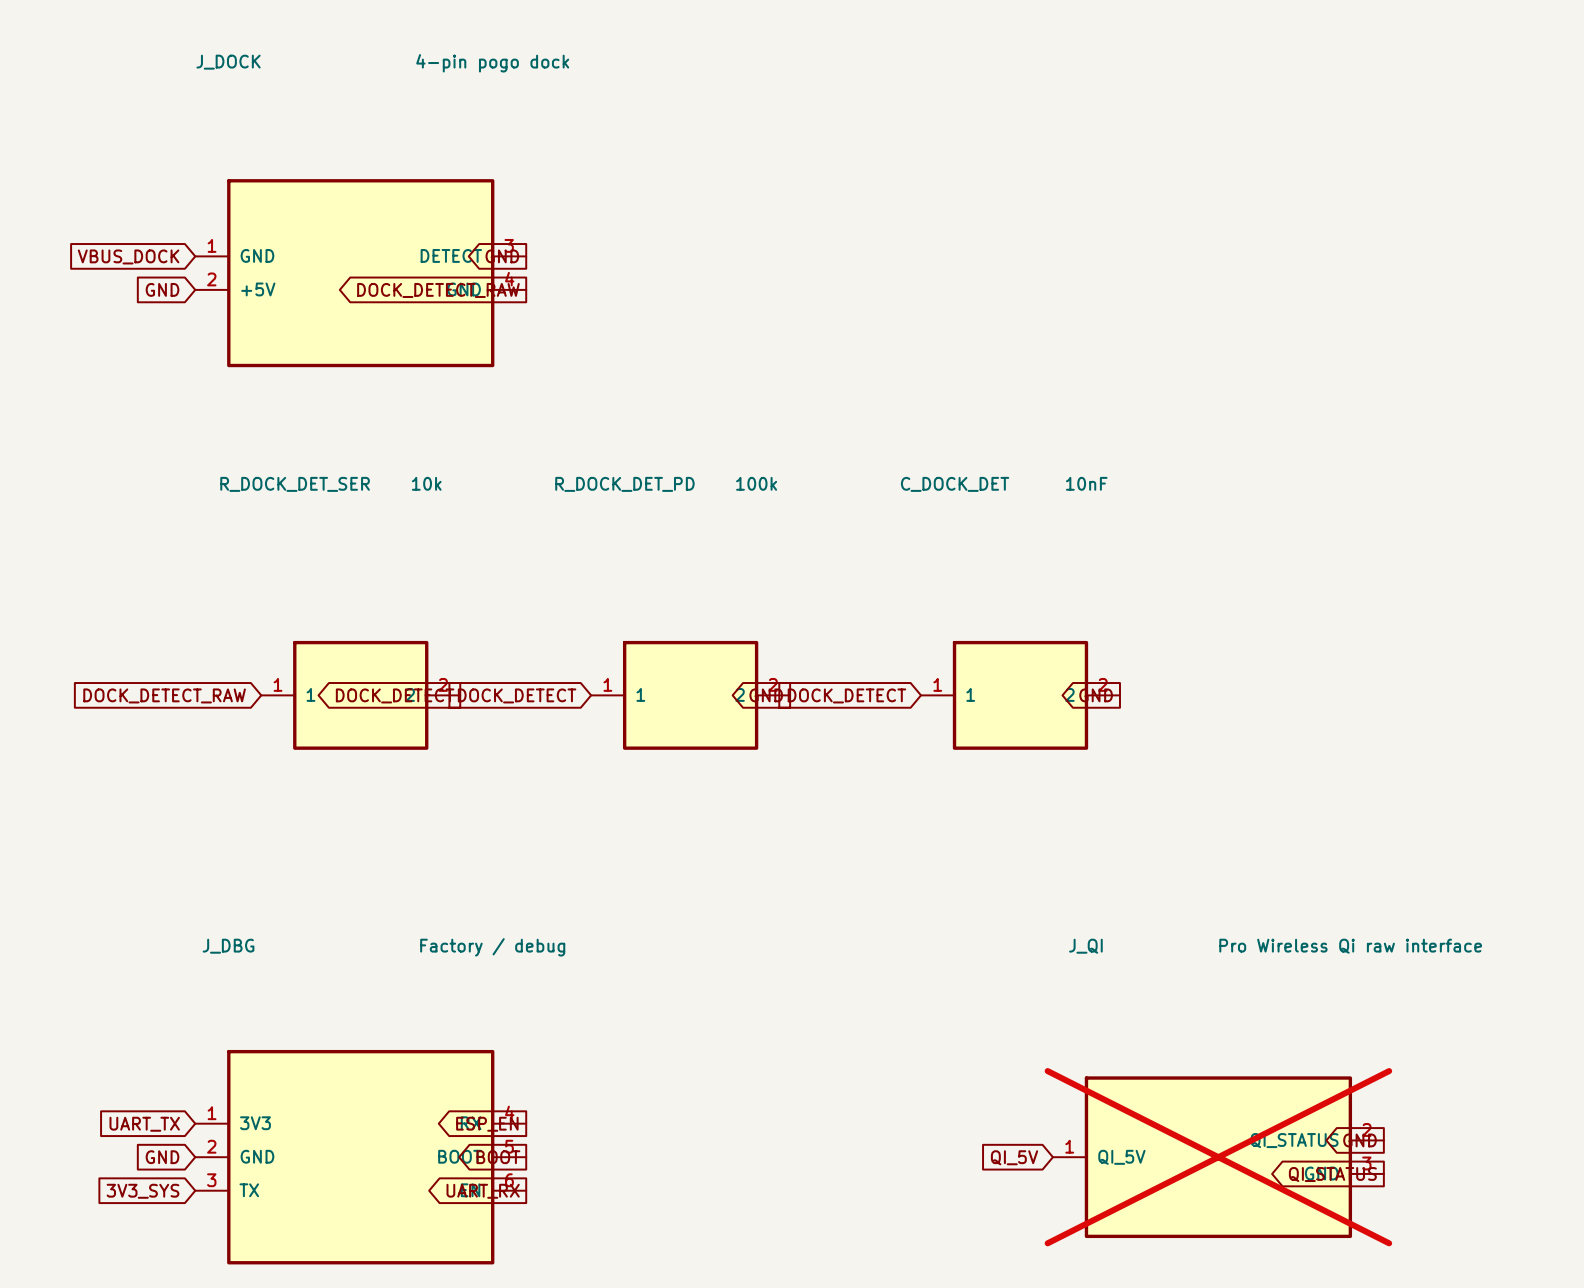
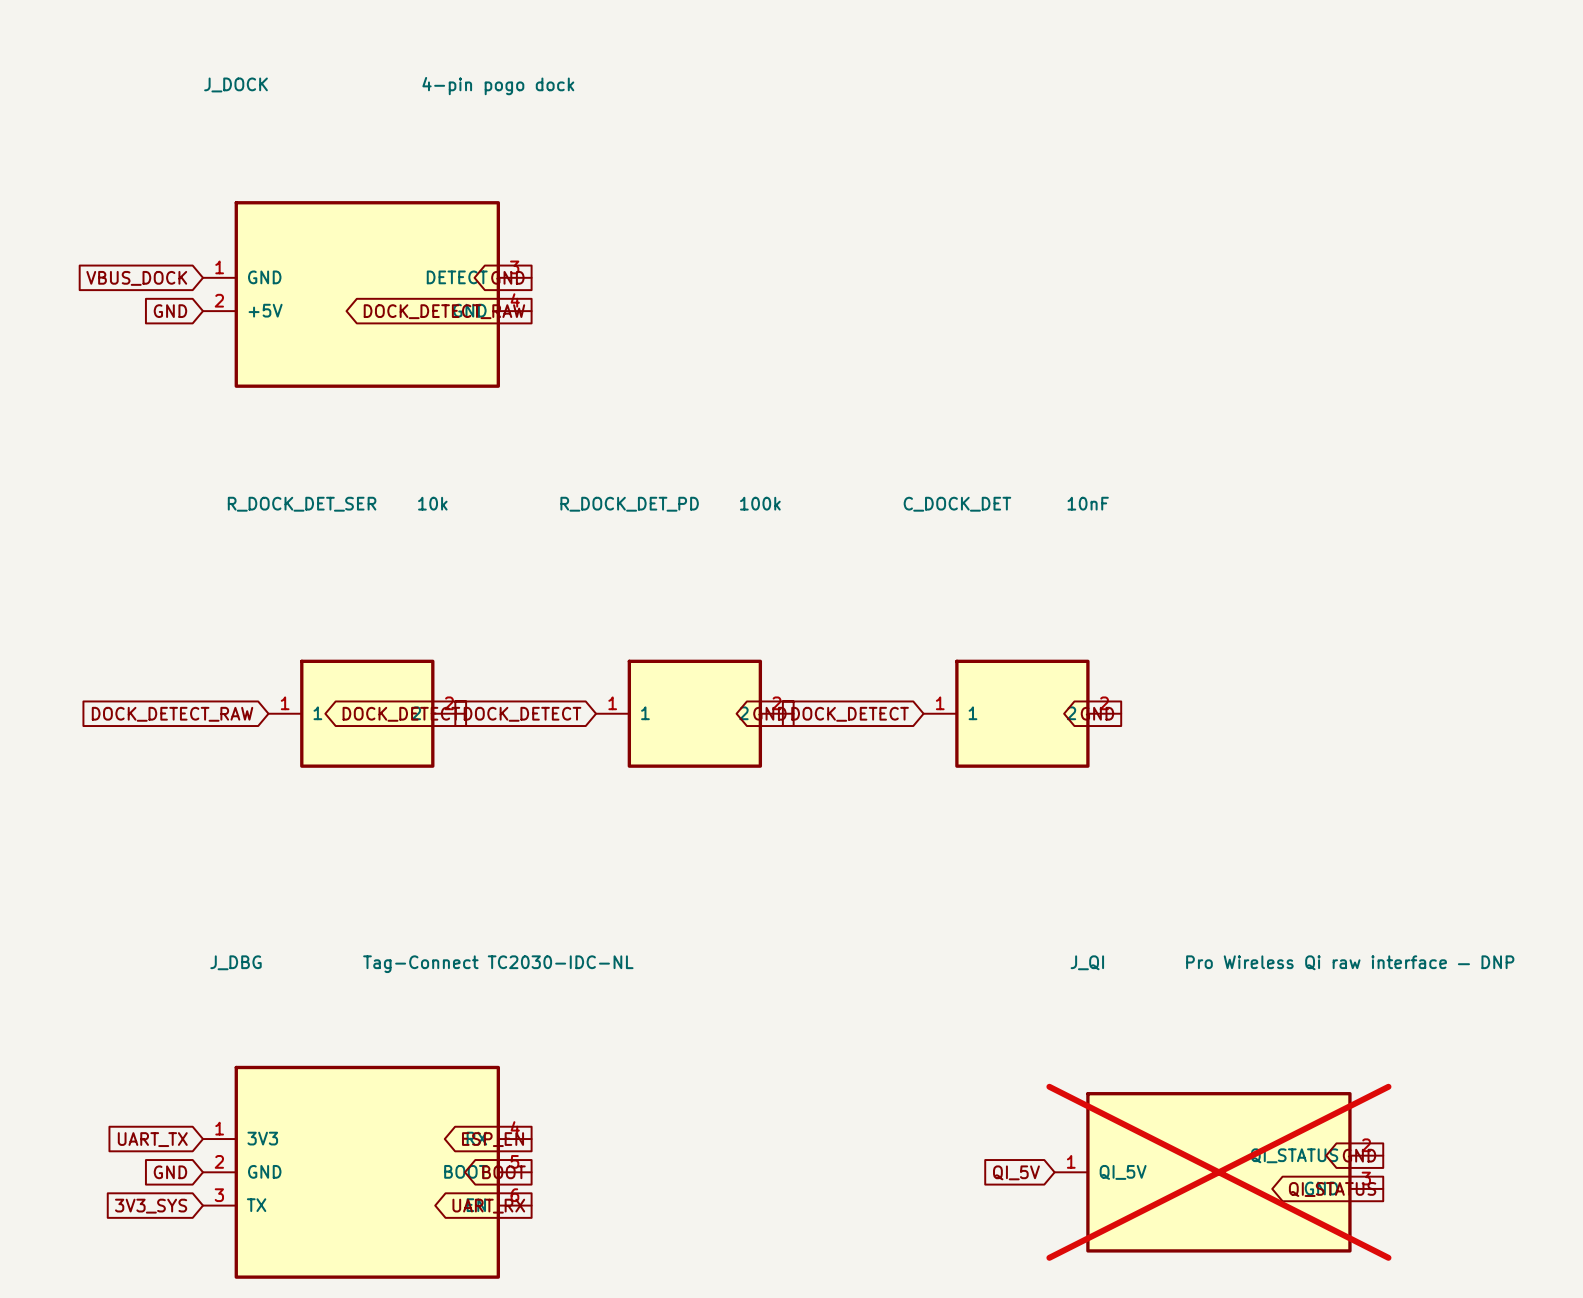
J_QI value: Pro Wireless Qi raw interface (1350, 946) -> Pro Wireless Qi raw interface — DNP (1350, 962)
J_DBG value: Factory / debug (492, 947) -> Tag-Connect TC2030-IDC-NL (498, 964)

